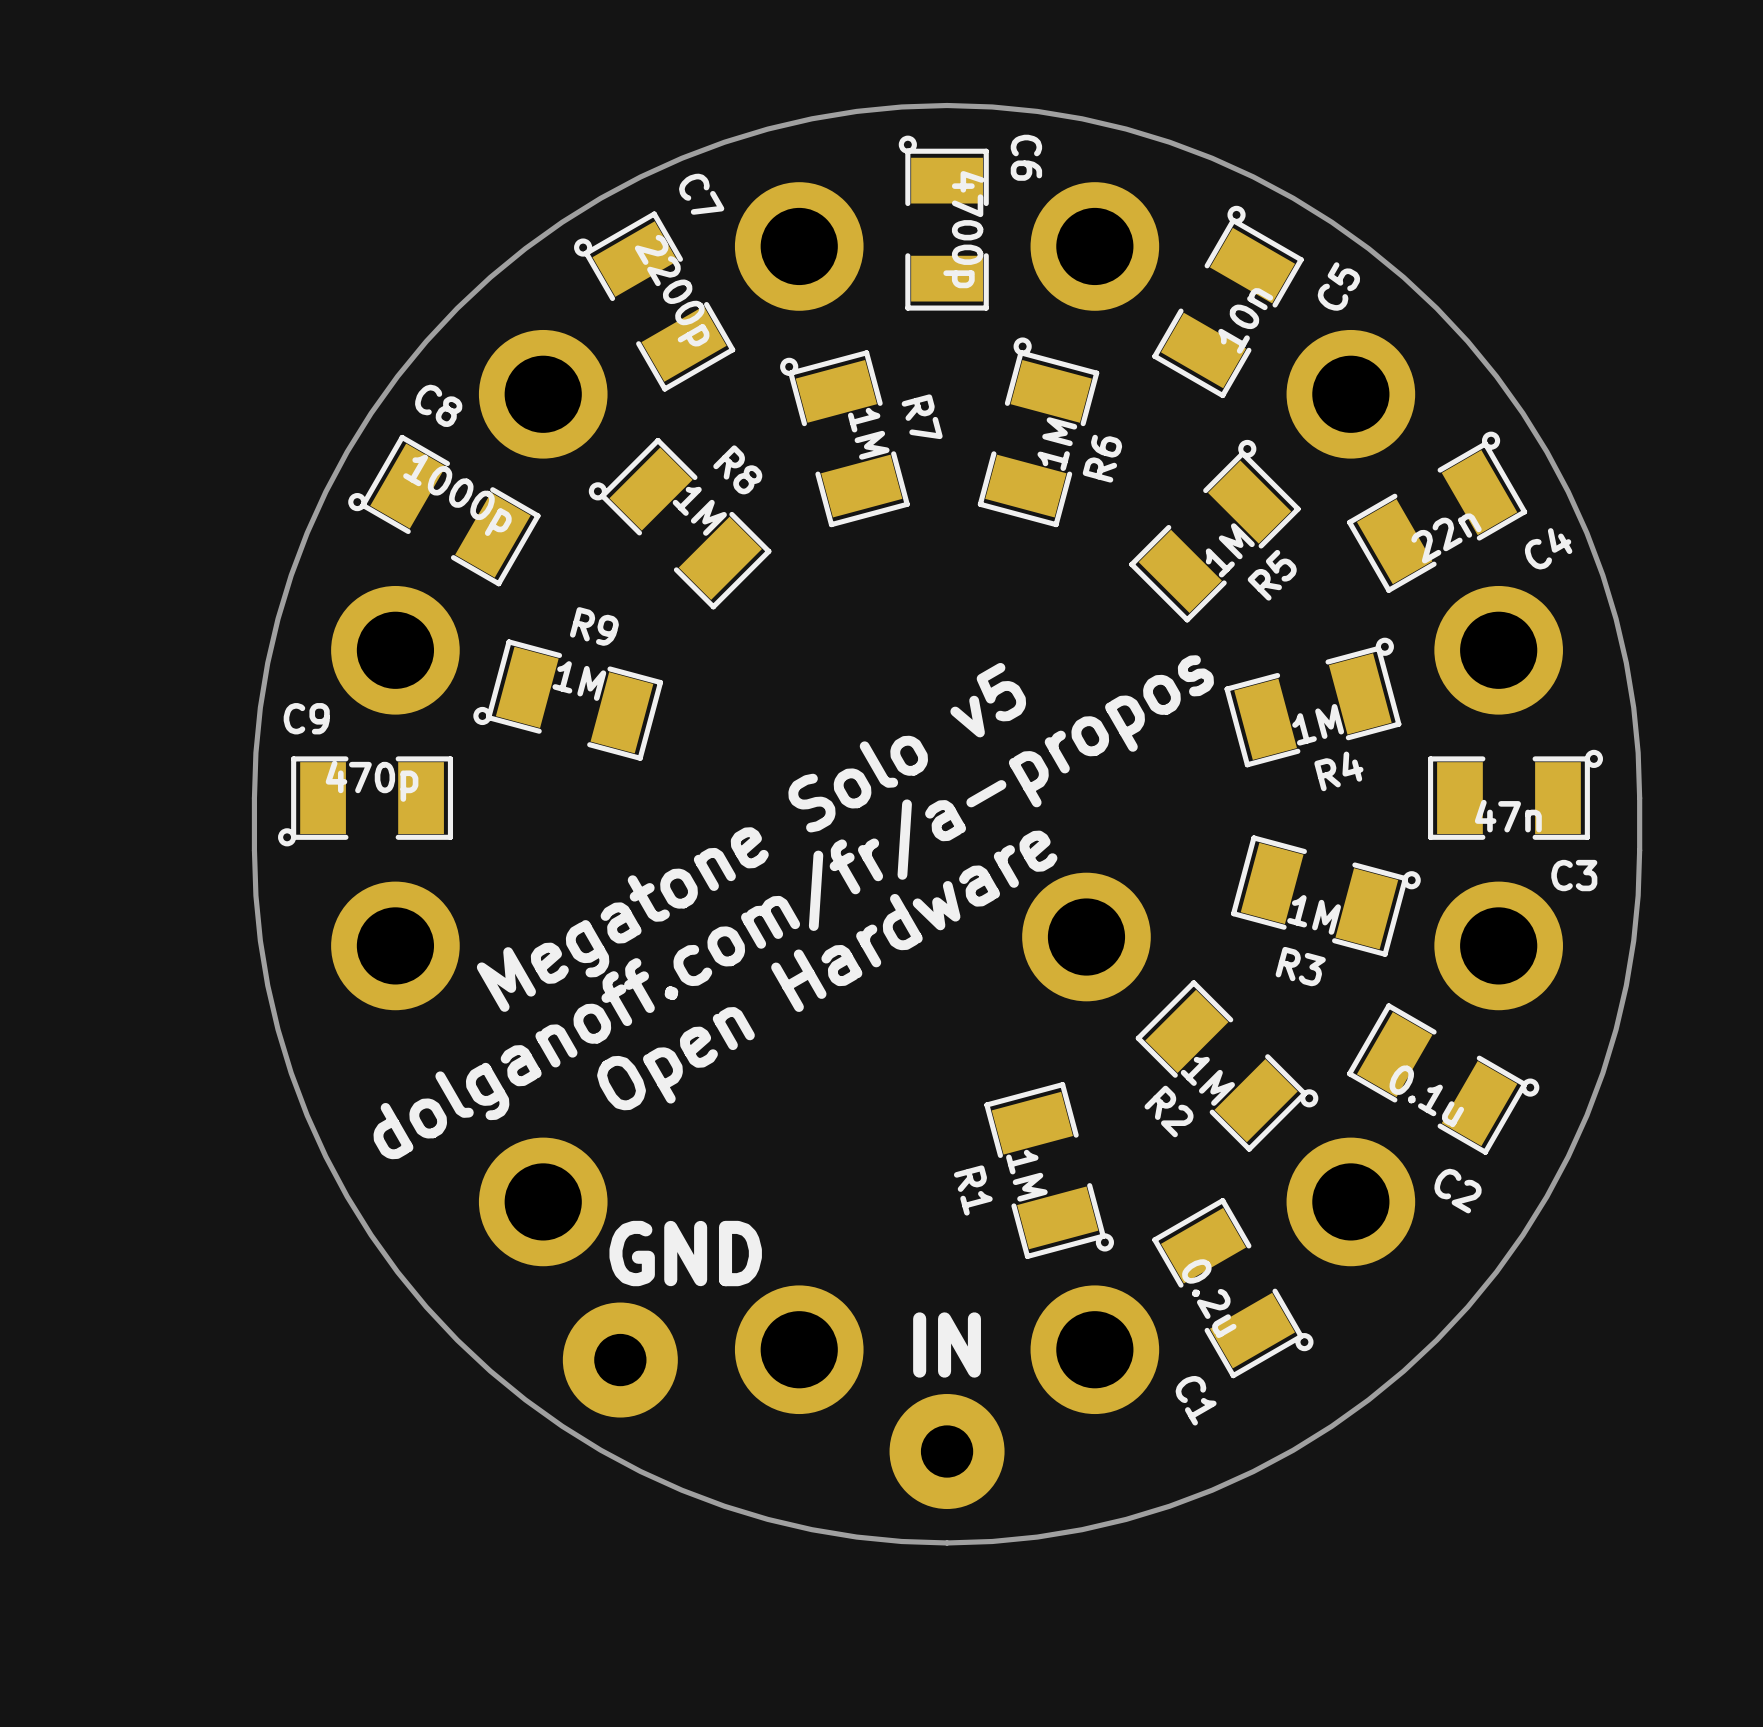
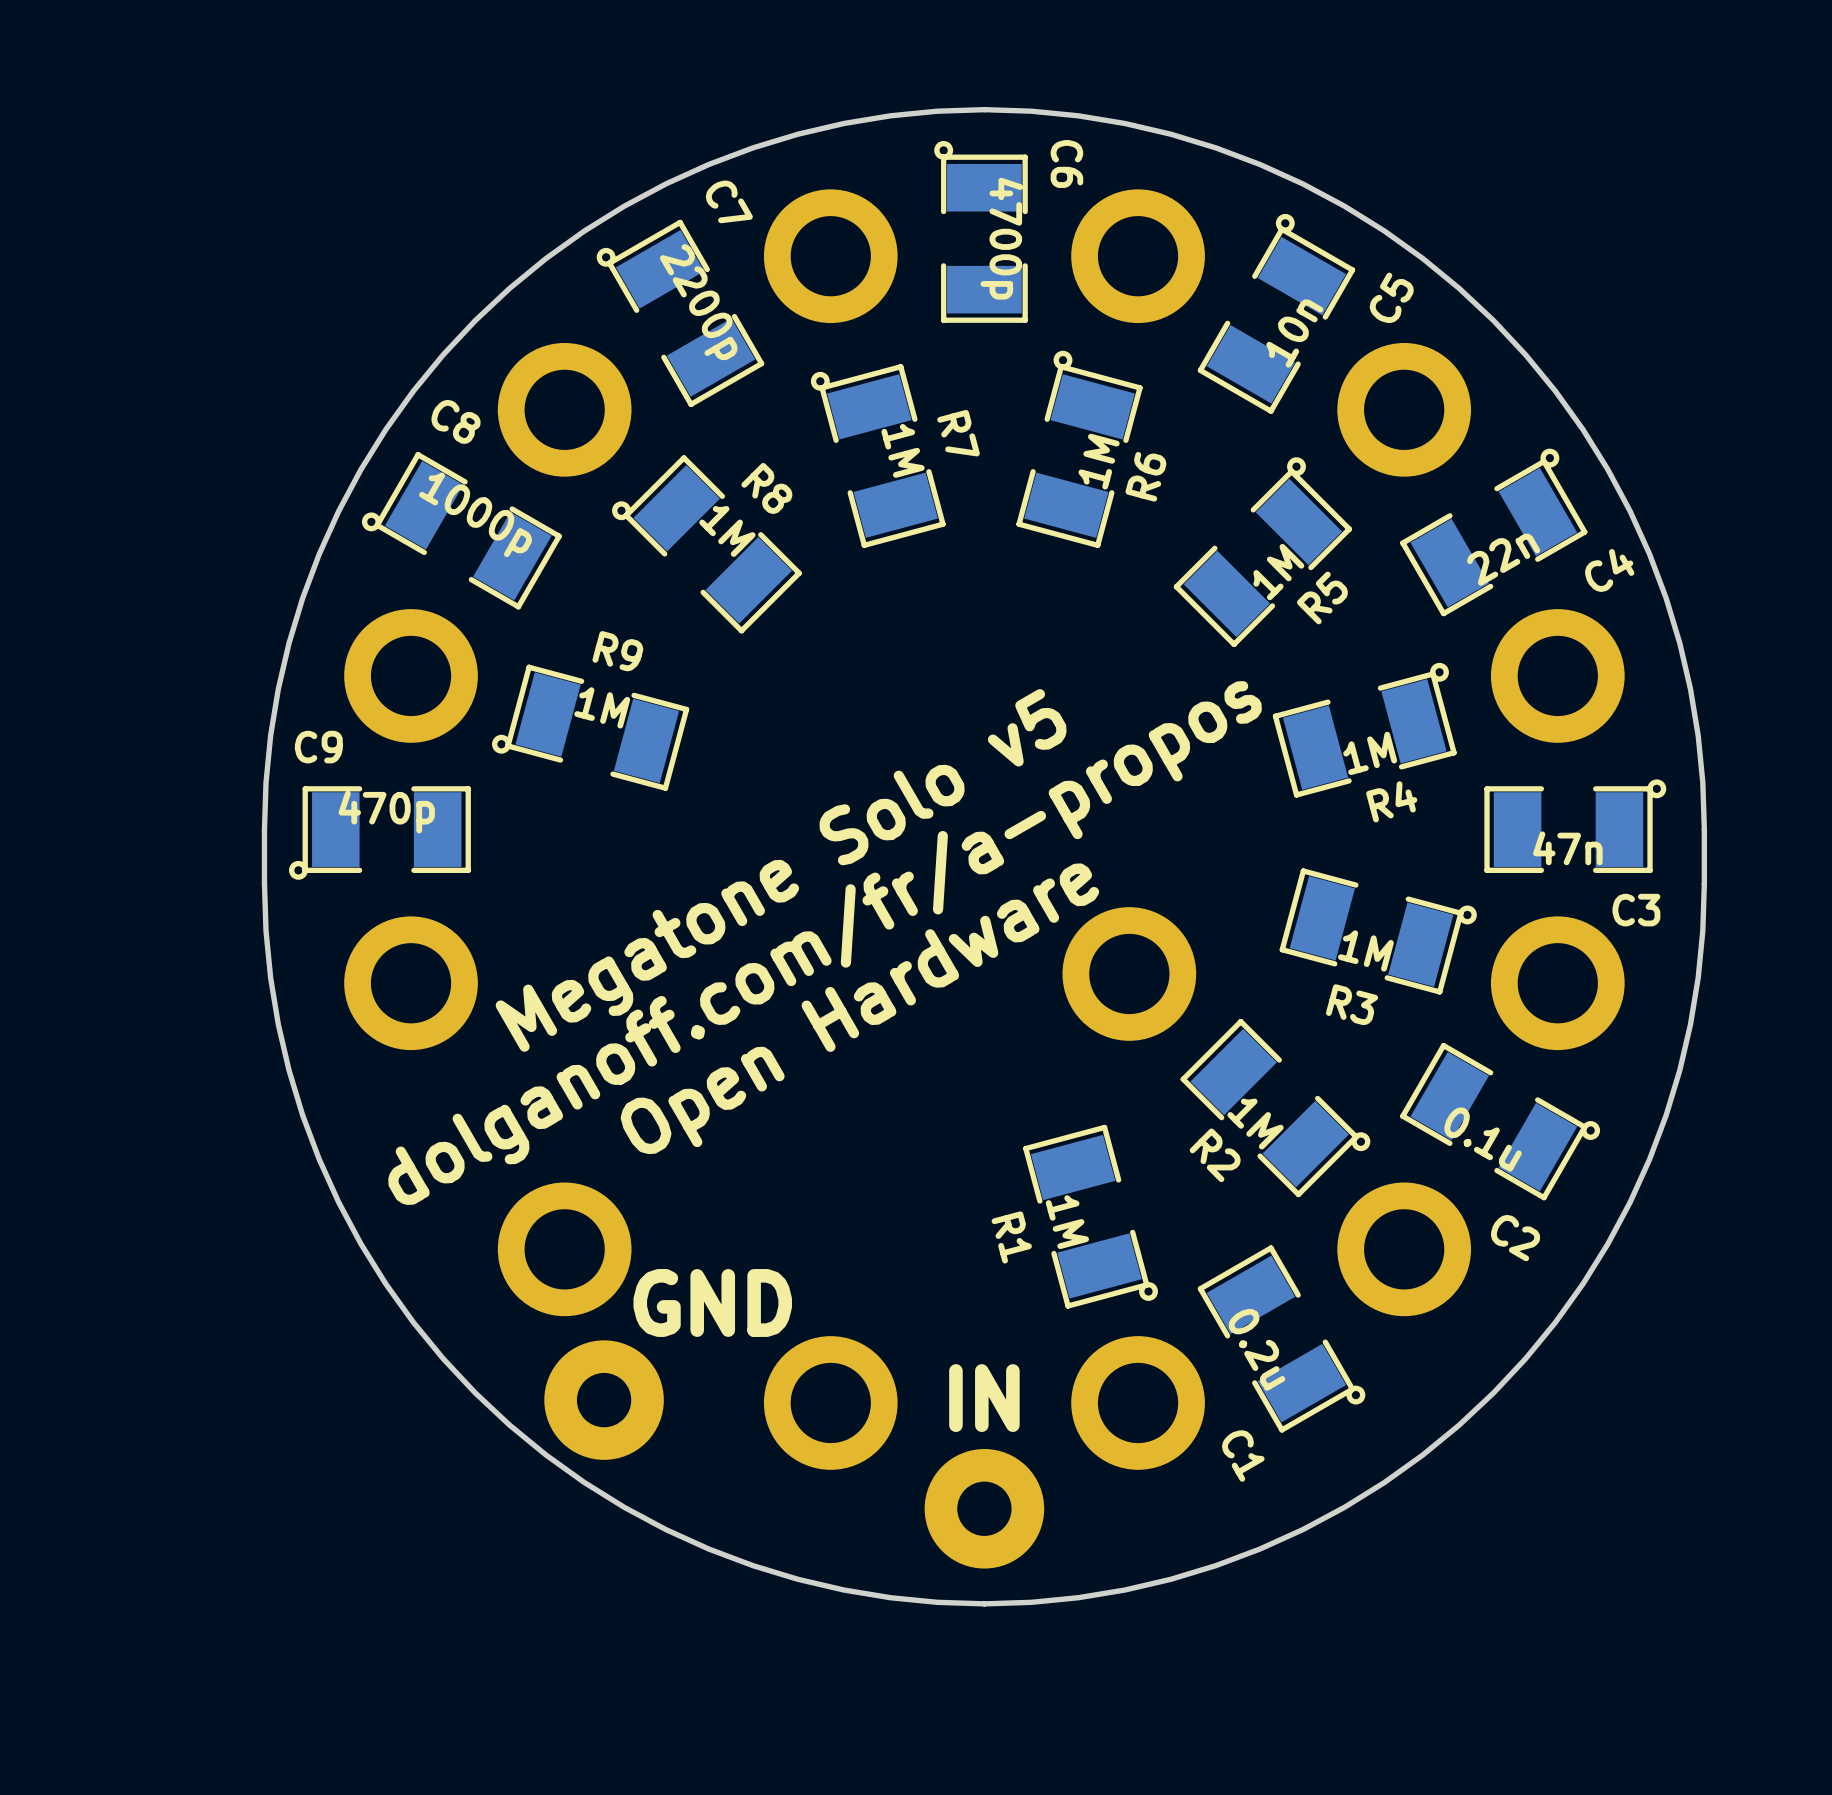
part position: (620, 1360) -> (604, 1400)

